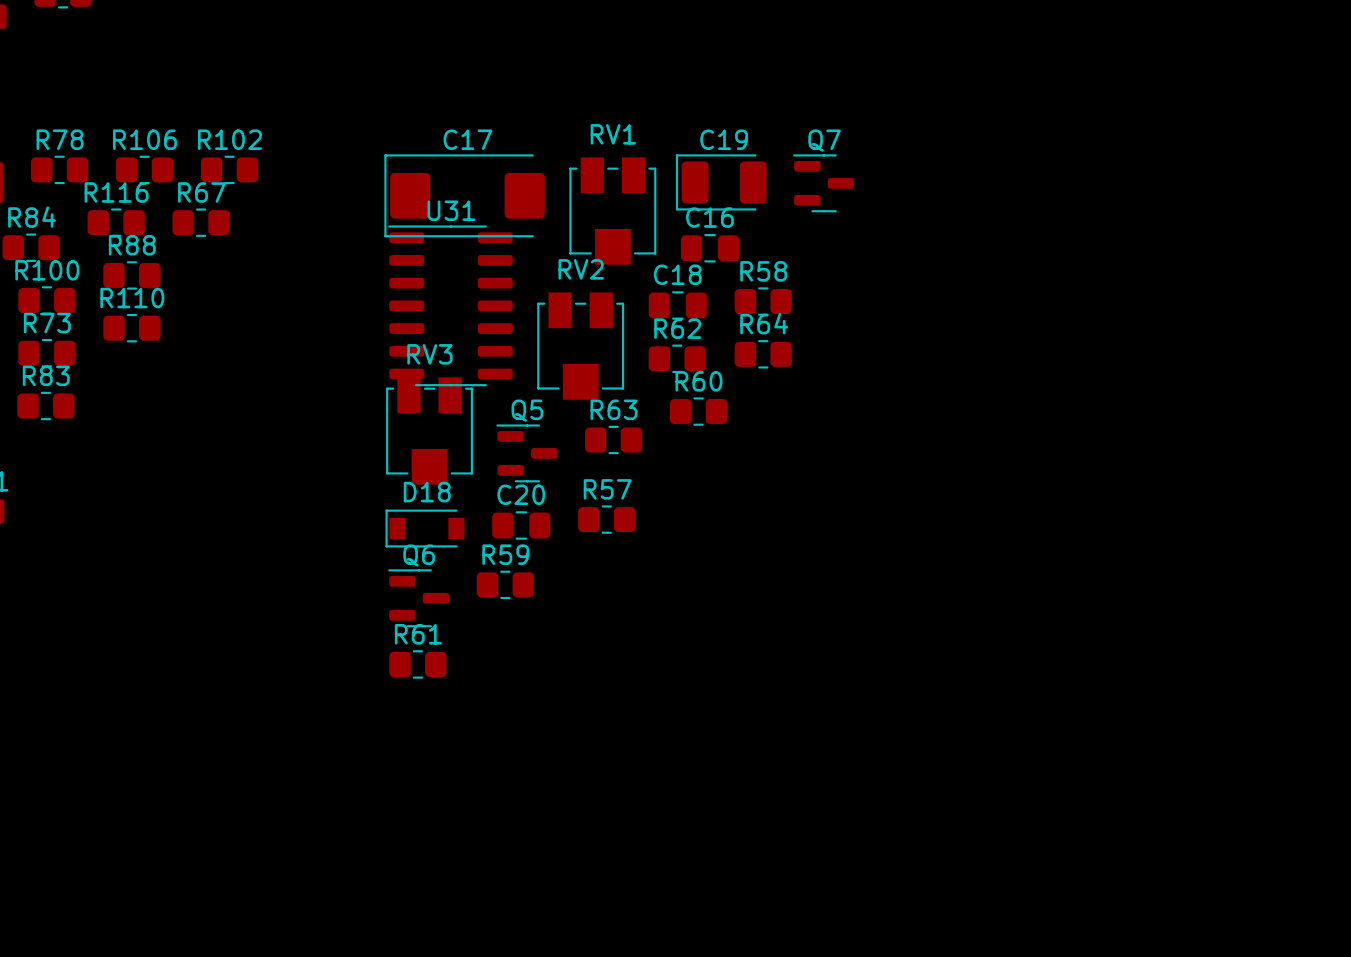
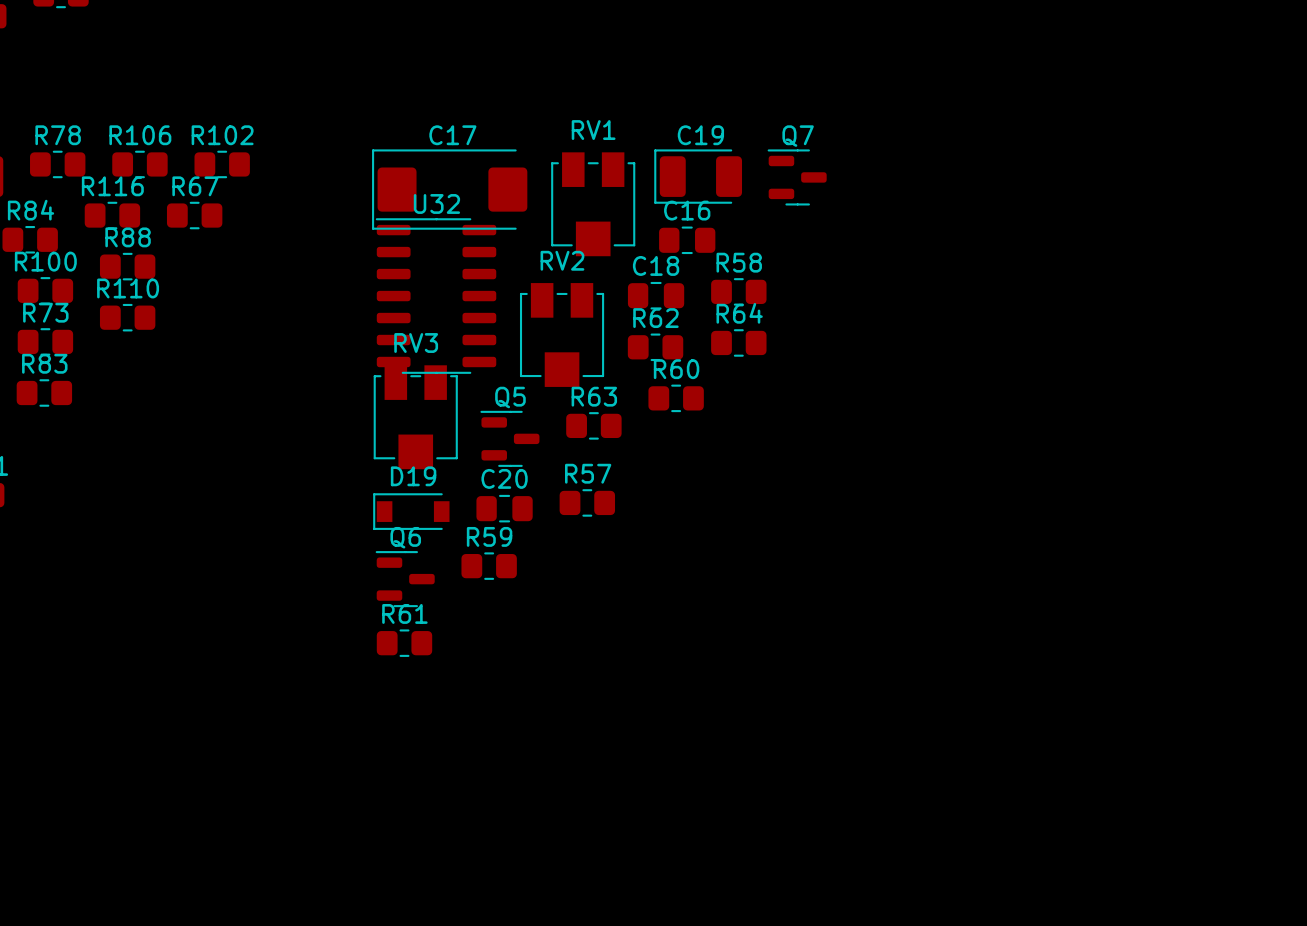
U31 name: U31 (451, 210) -> U32 (436, 203)
D18 name: D18 (427, 492) -> D19 (413, 476)

